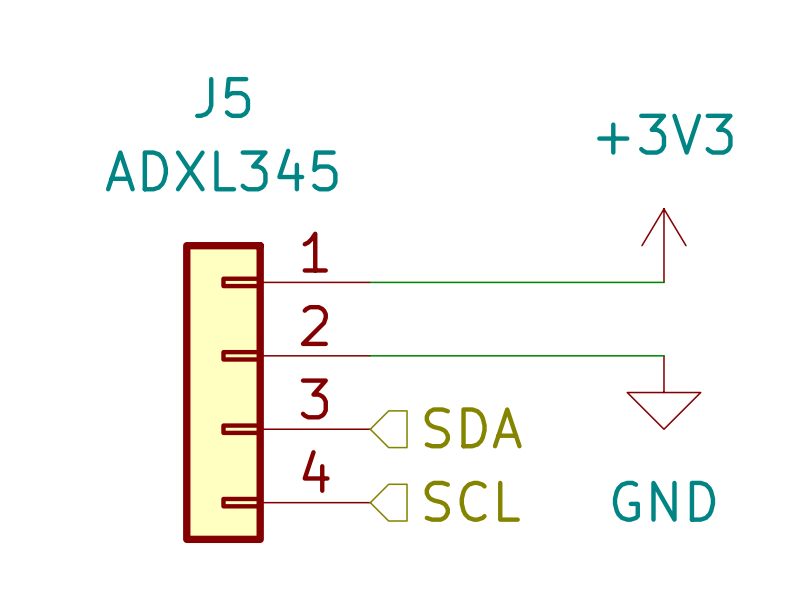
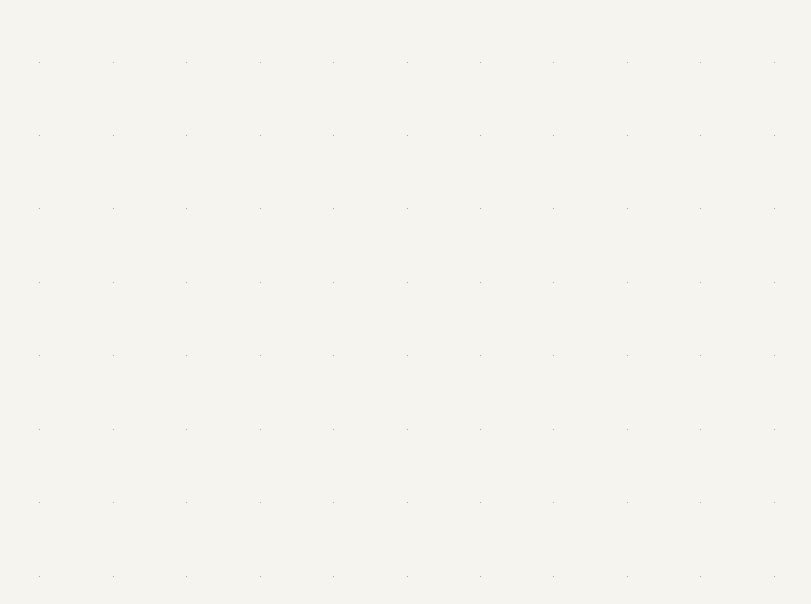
power symbol: +3V3 (663, 245) -> none
wire: (370, 282) (663, 282) -> none
wire: (370, 355) (663, 355) -> none
J5: ADXL345 (276, 392) -> none
power symbol: GND (663, 392) -> none
hierarchical label: SDA (473, 427) -> none
hierarchical label: SCL (472, 501) -> none

